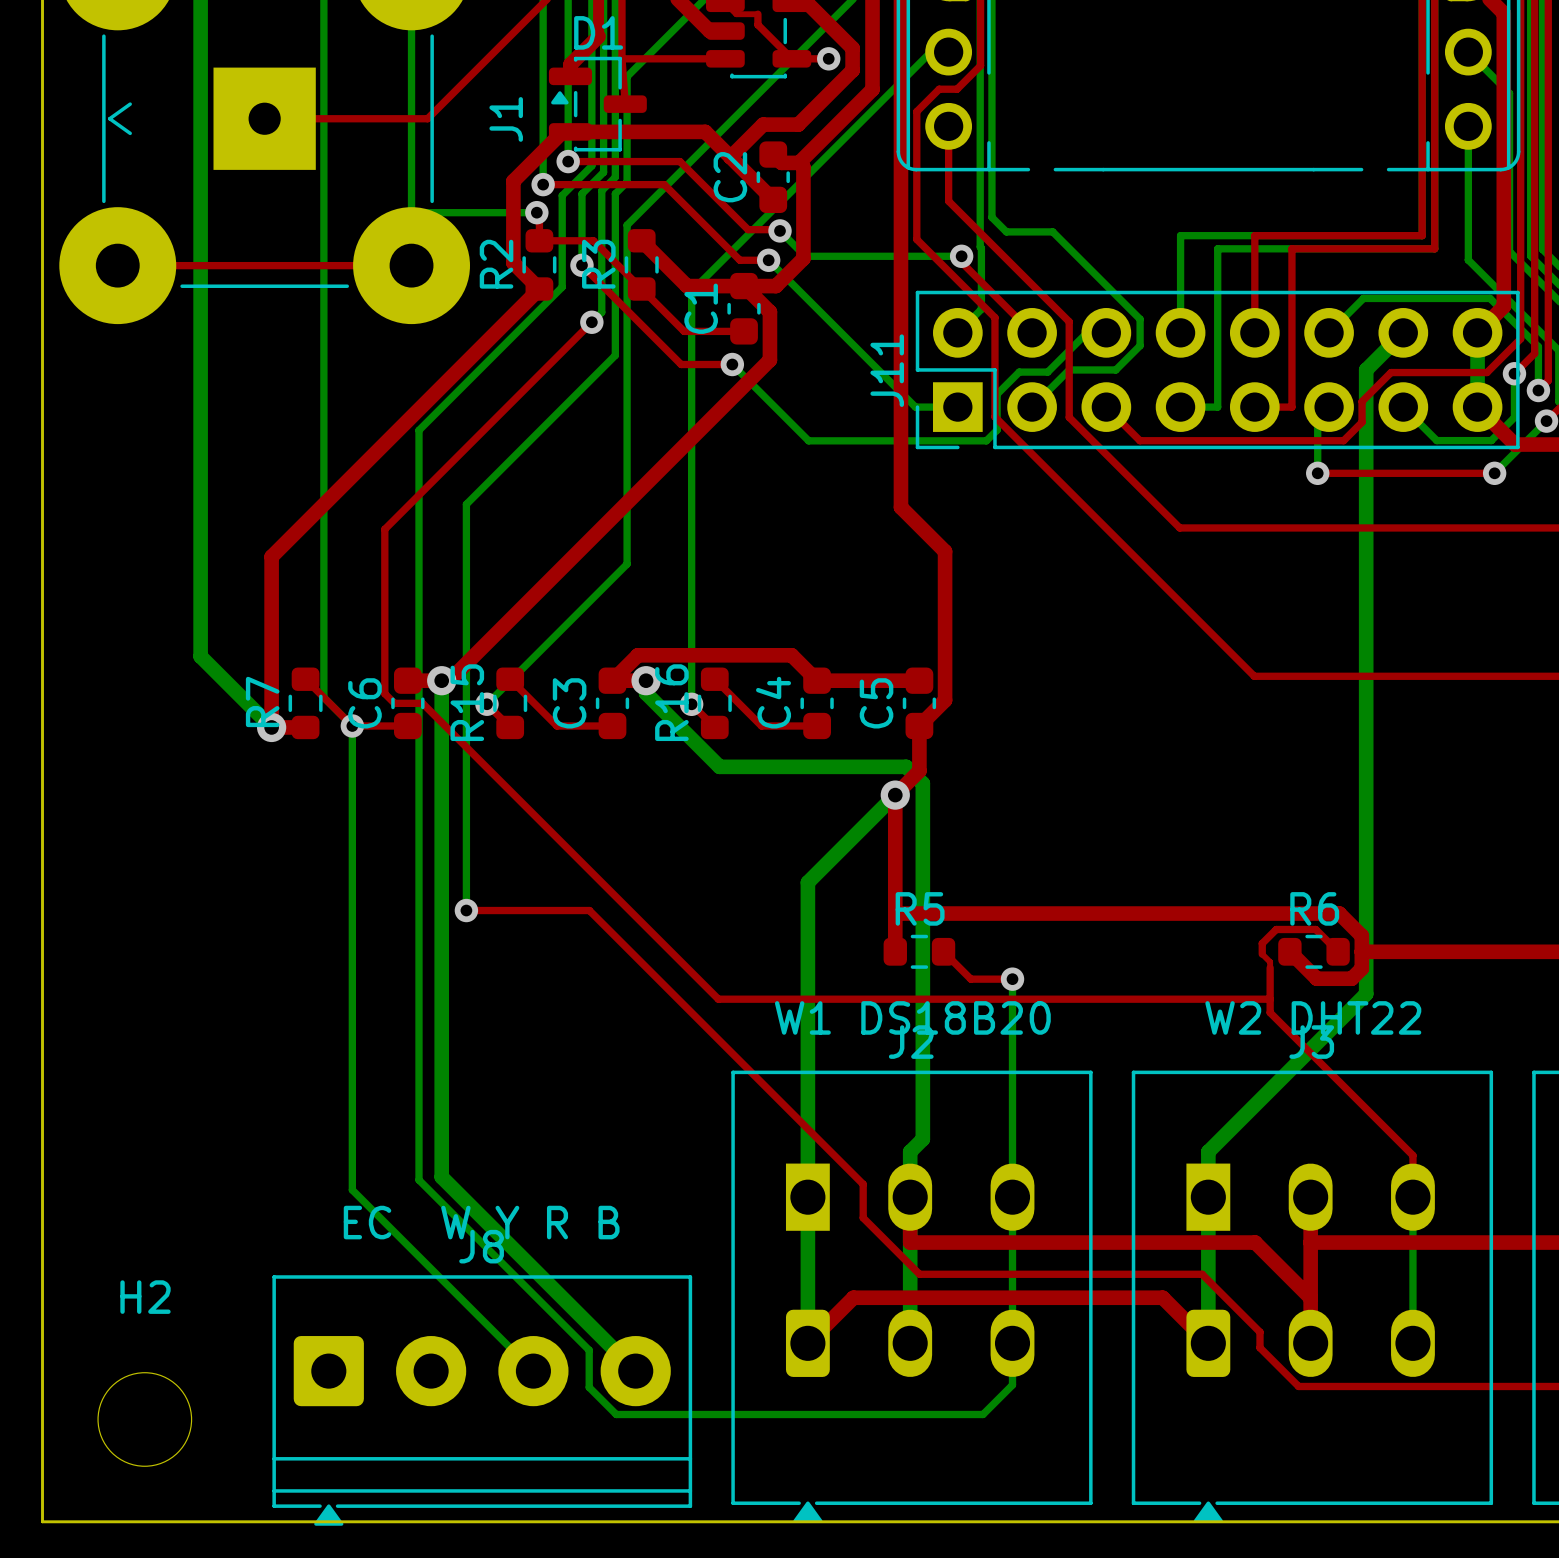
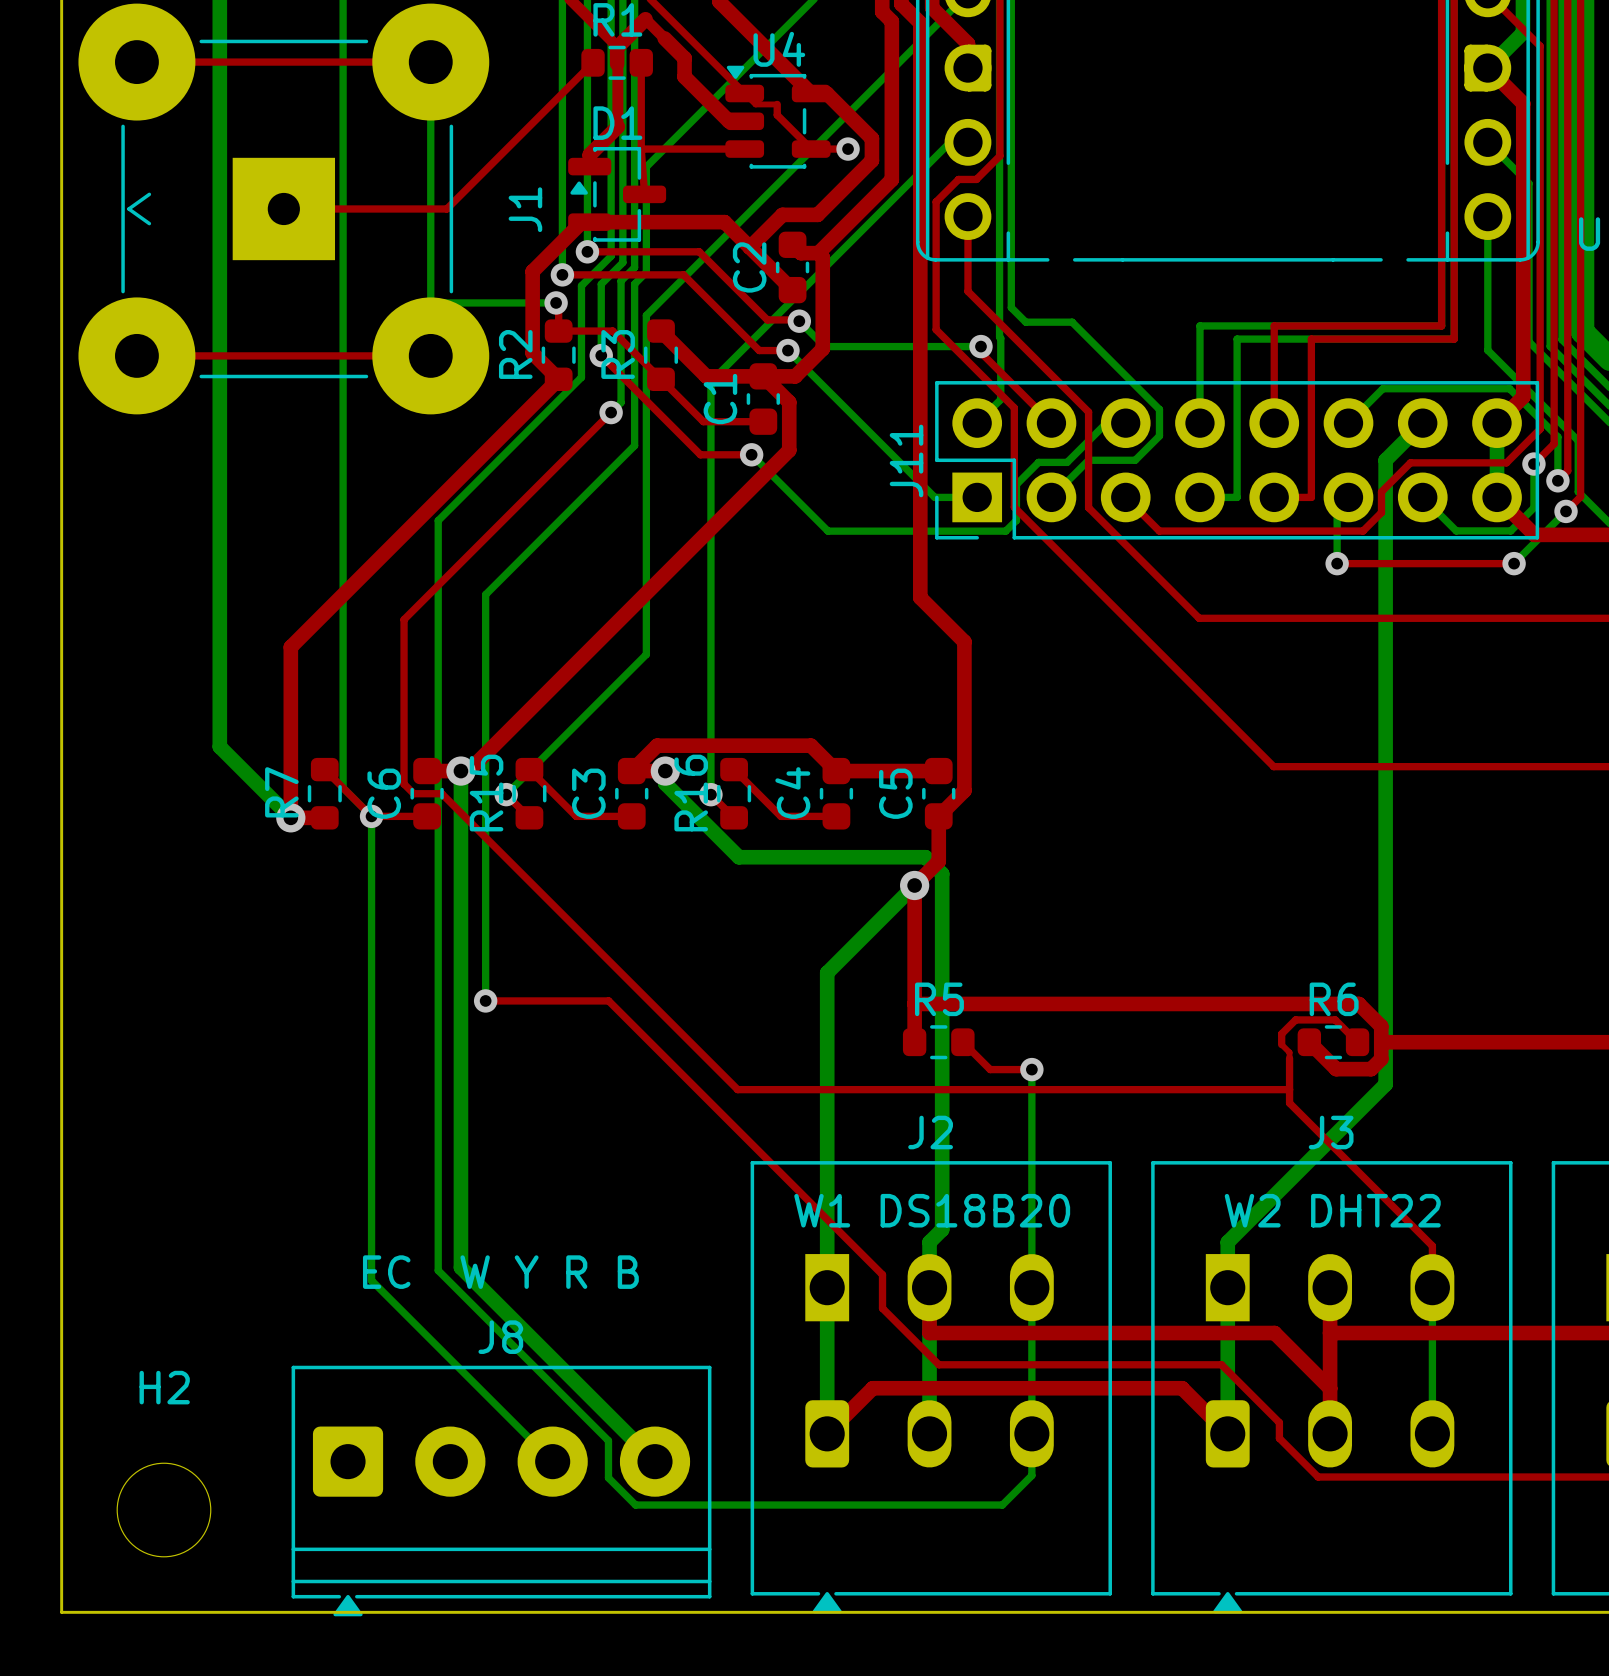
text position: W1 DS18B20 (912, 1017) -> W1 DS18B20 (932, 1210)
text position: W2 DHT22 (1313, 1017) -> W2 DHT22 (1332, 1210)
text position: EC W Y R B (481, 1222) -> EC W Y R B (500, 1272)

